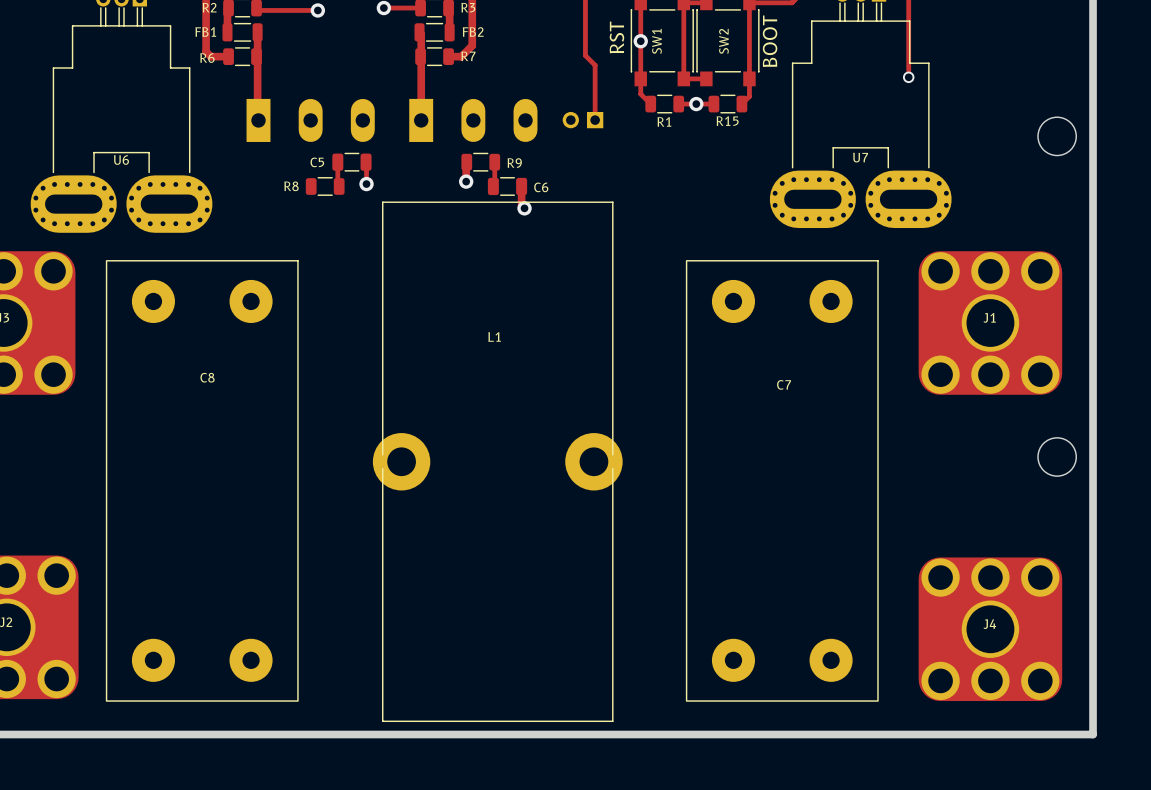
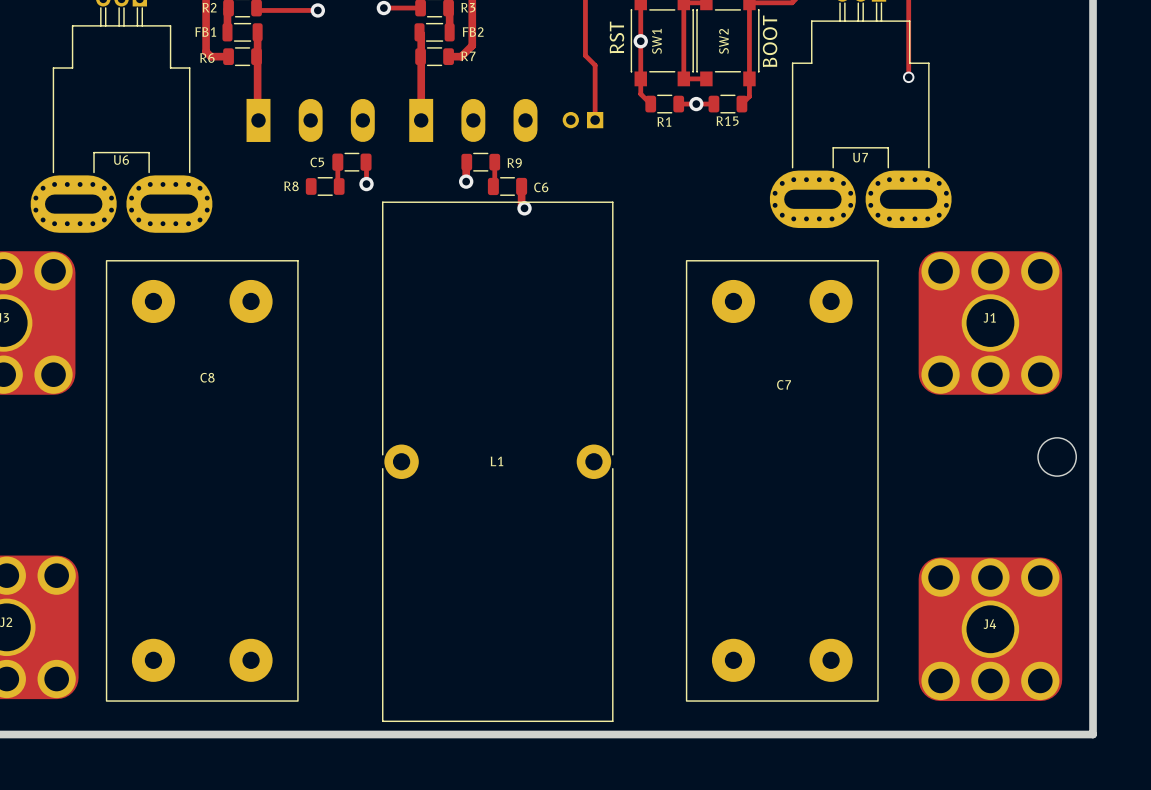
round board edge: [1037, 116, 1077, 157] -> none
L1 footprint: [372, 201, 623, 722] -> [382, 201, 614, 722]
L1 name position: L1 (494, 336) -> L1 (497, 461)

